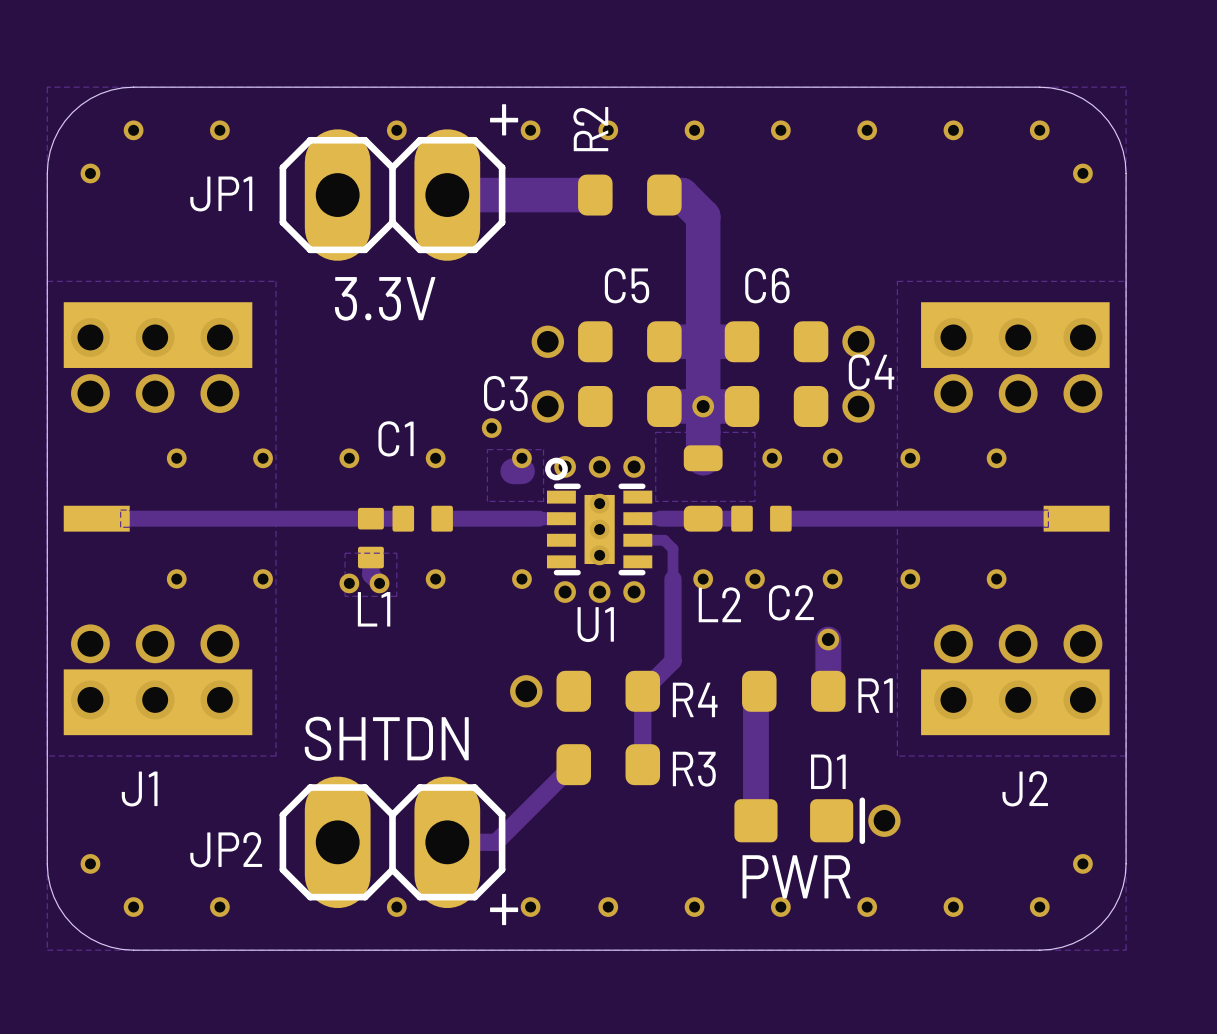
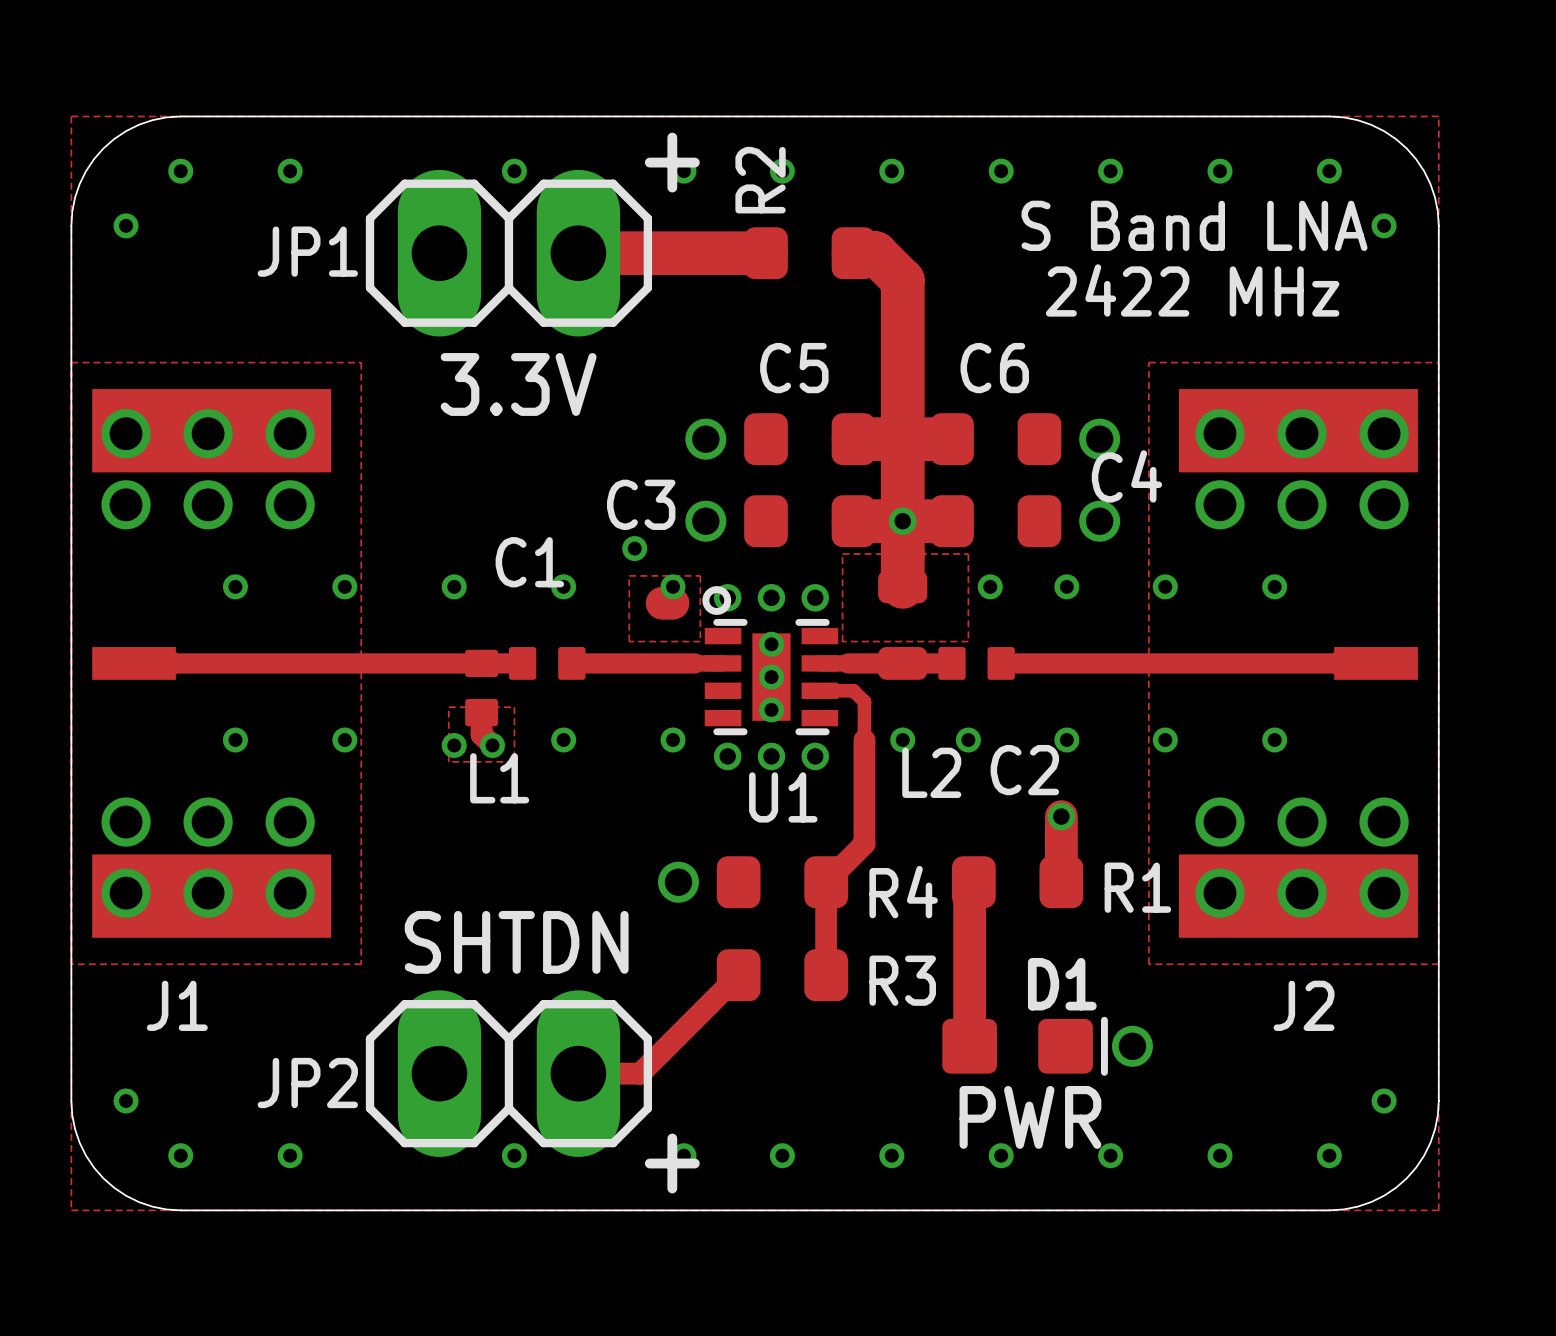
text: none -> S Band LNA (1194, 225)
text: none -> 2422 MHz (1192, 290)

